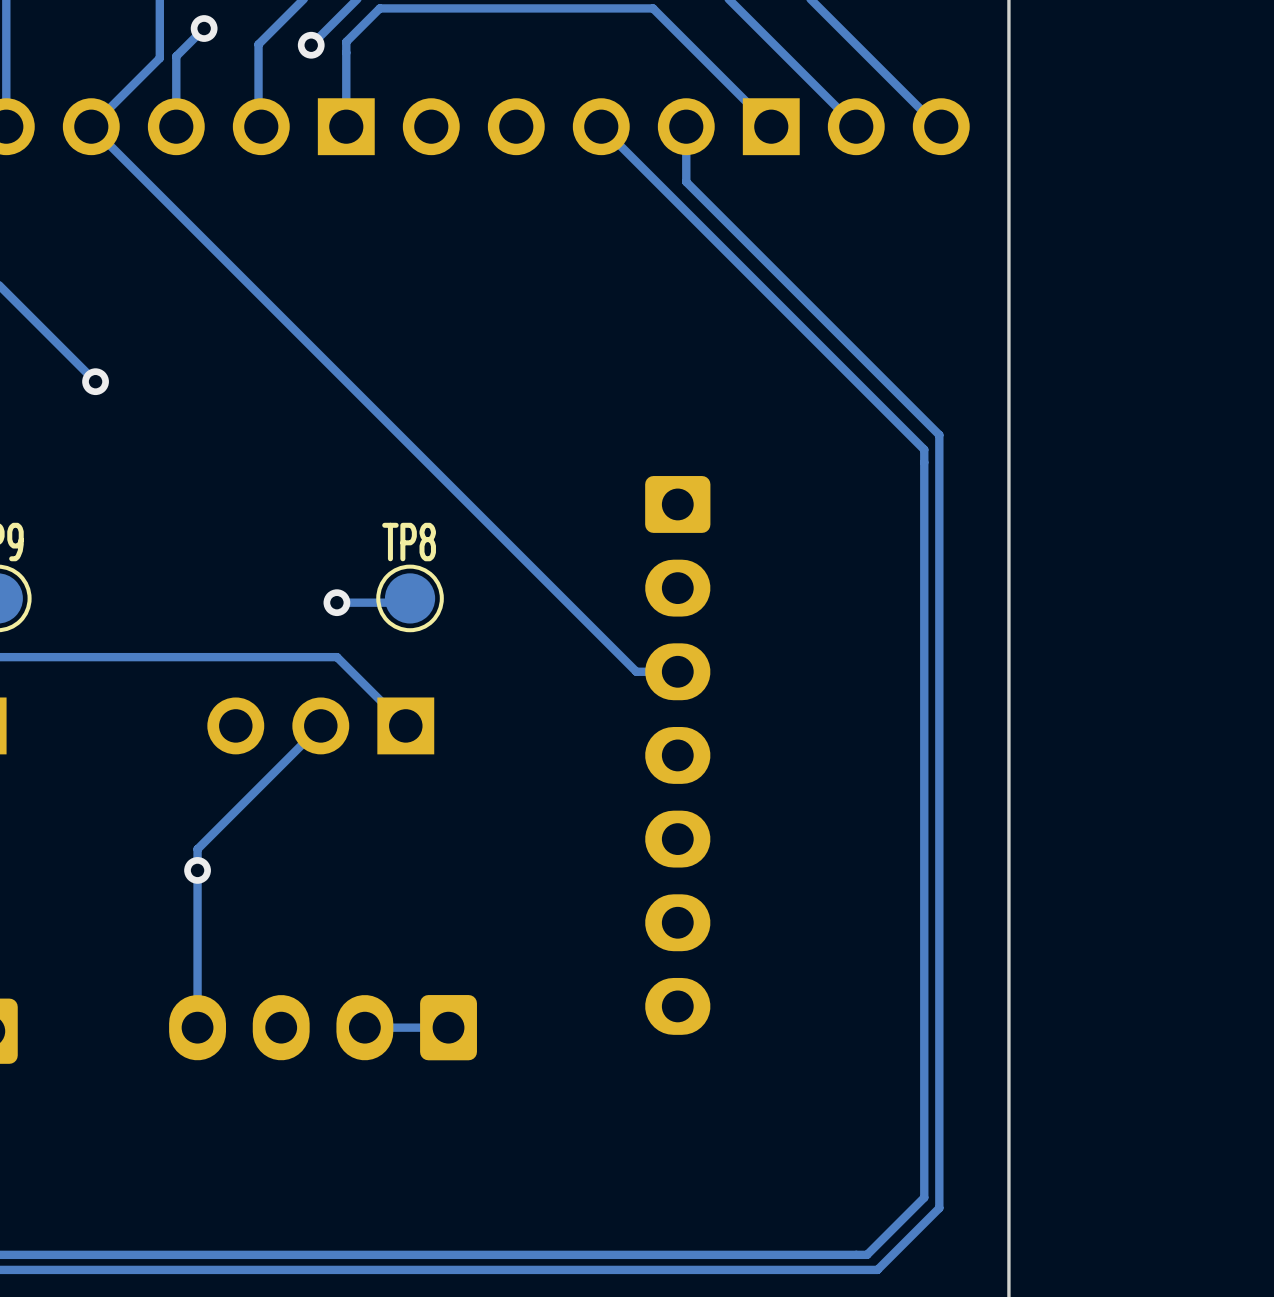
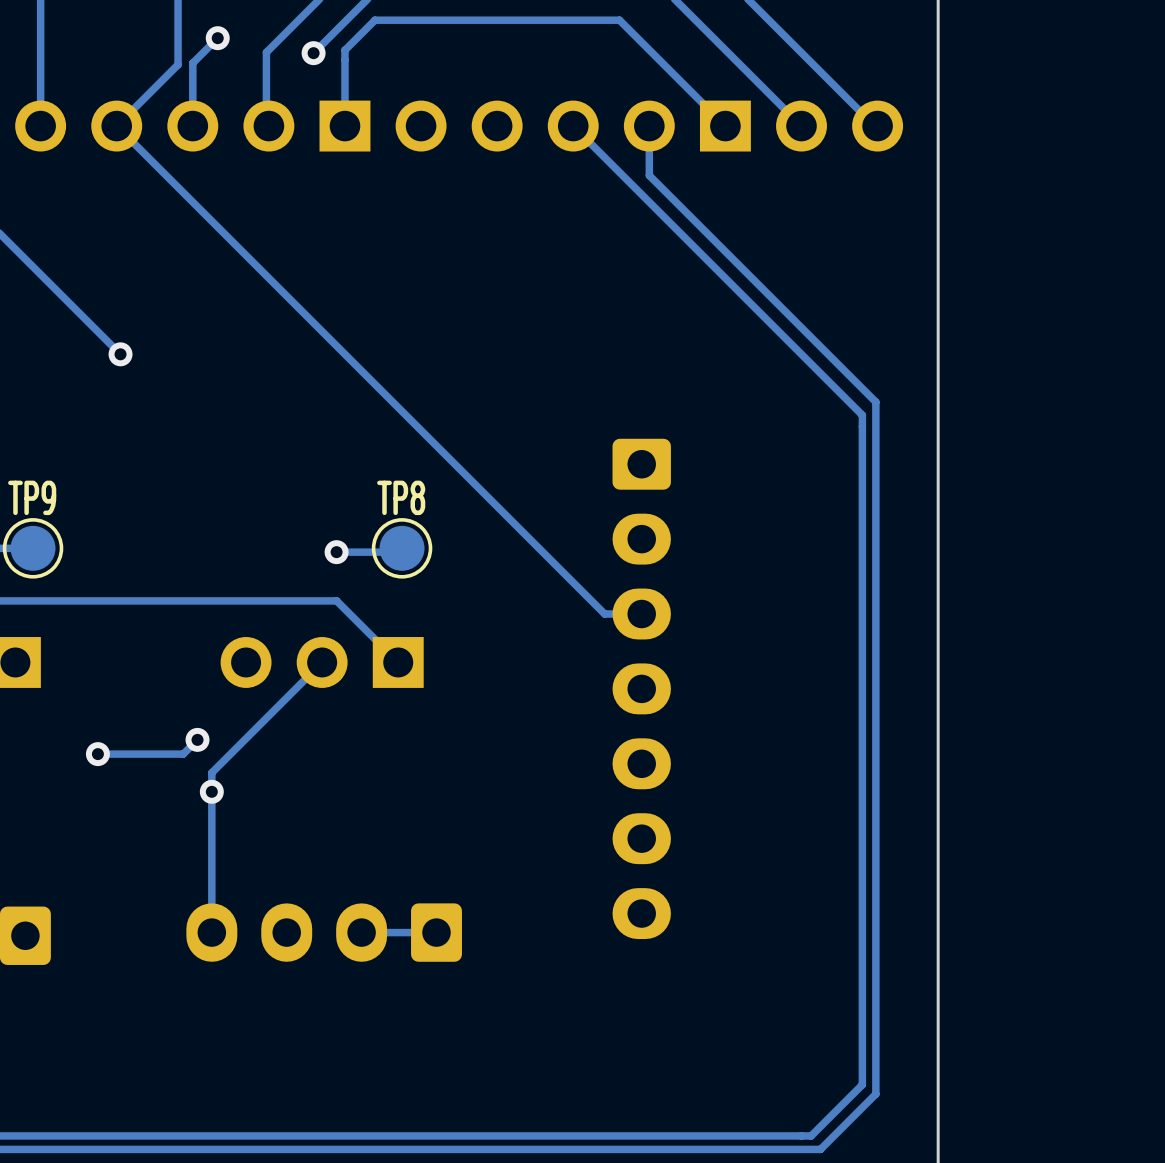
track: none -> (197, 739) (183, 754) (97, 754)
via: none -> (197, 739)
via: none -> (97, 754)

